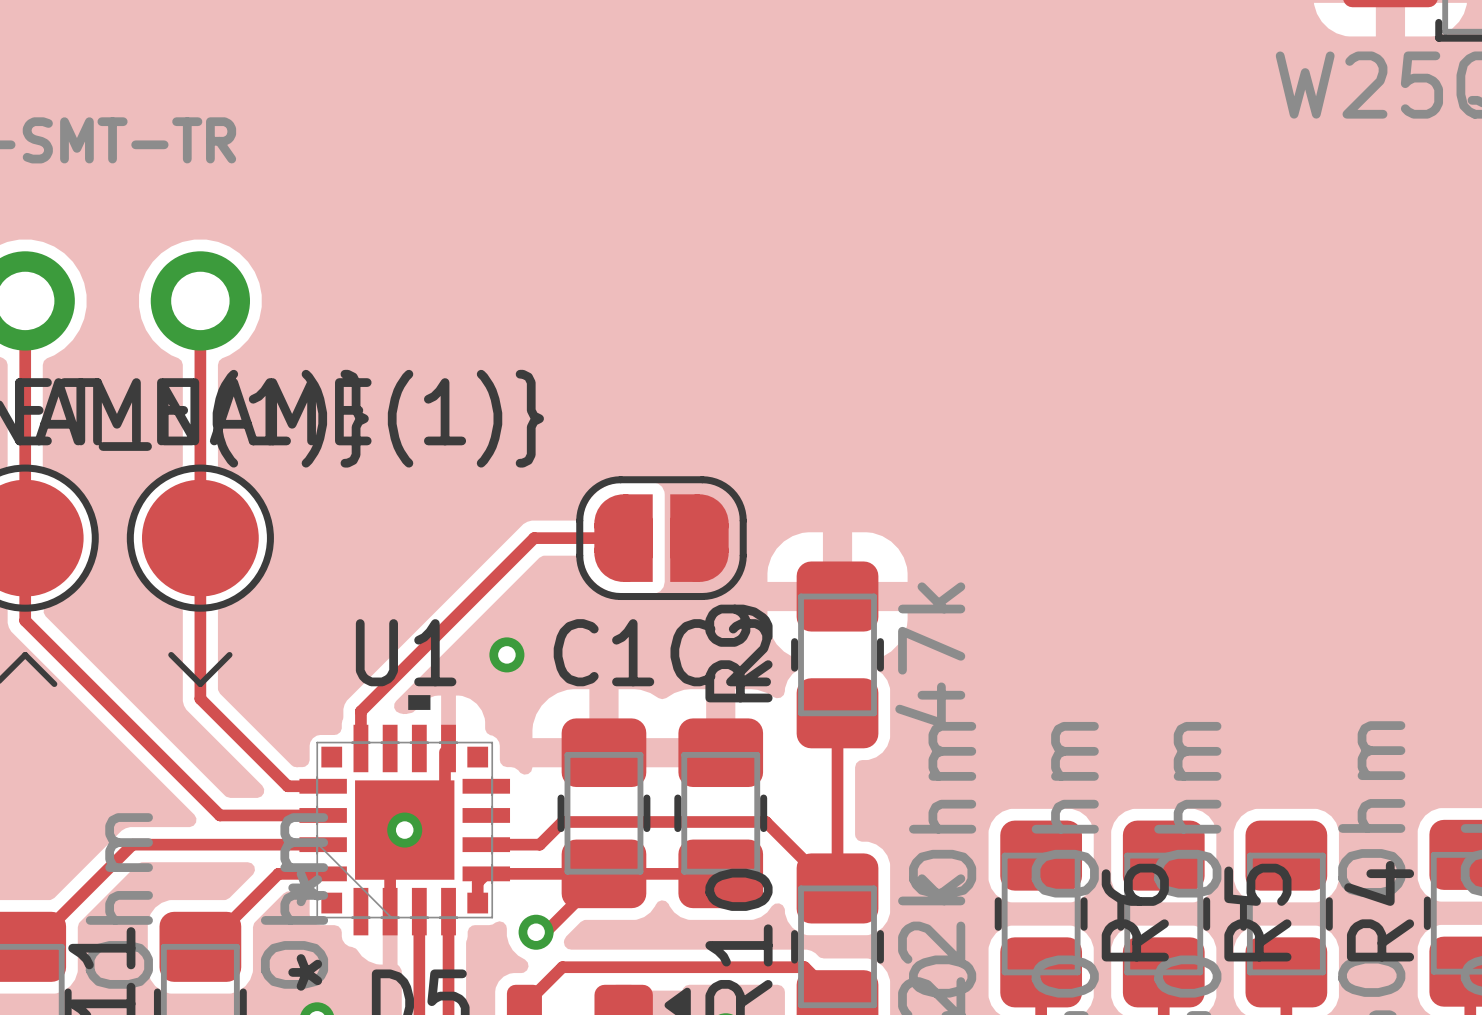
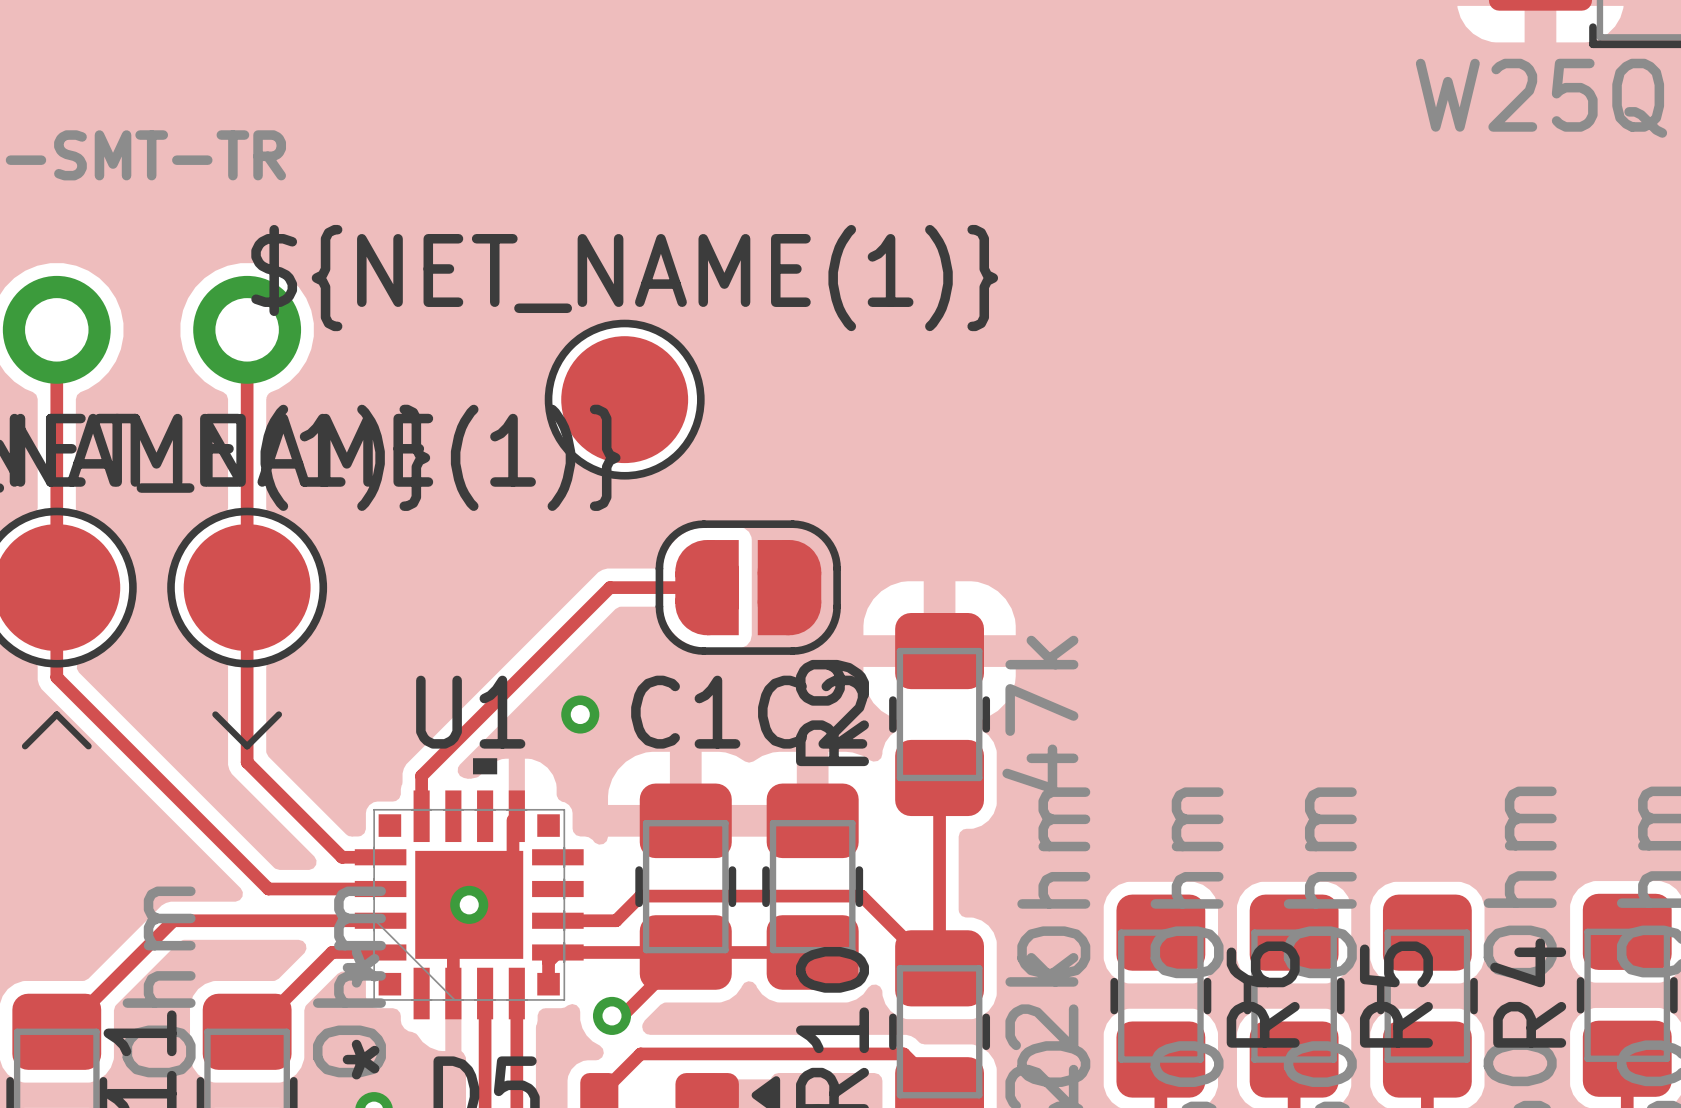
part: none -> (624, 399)

